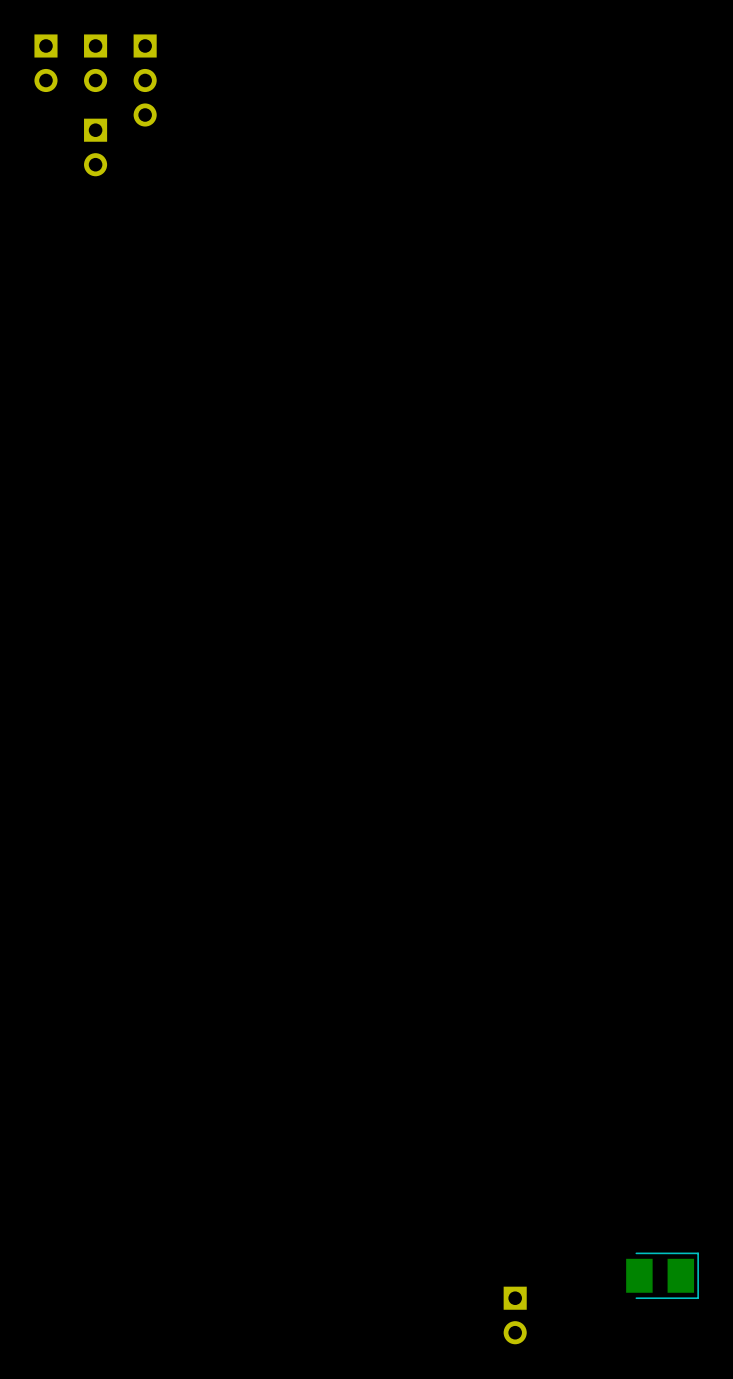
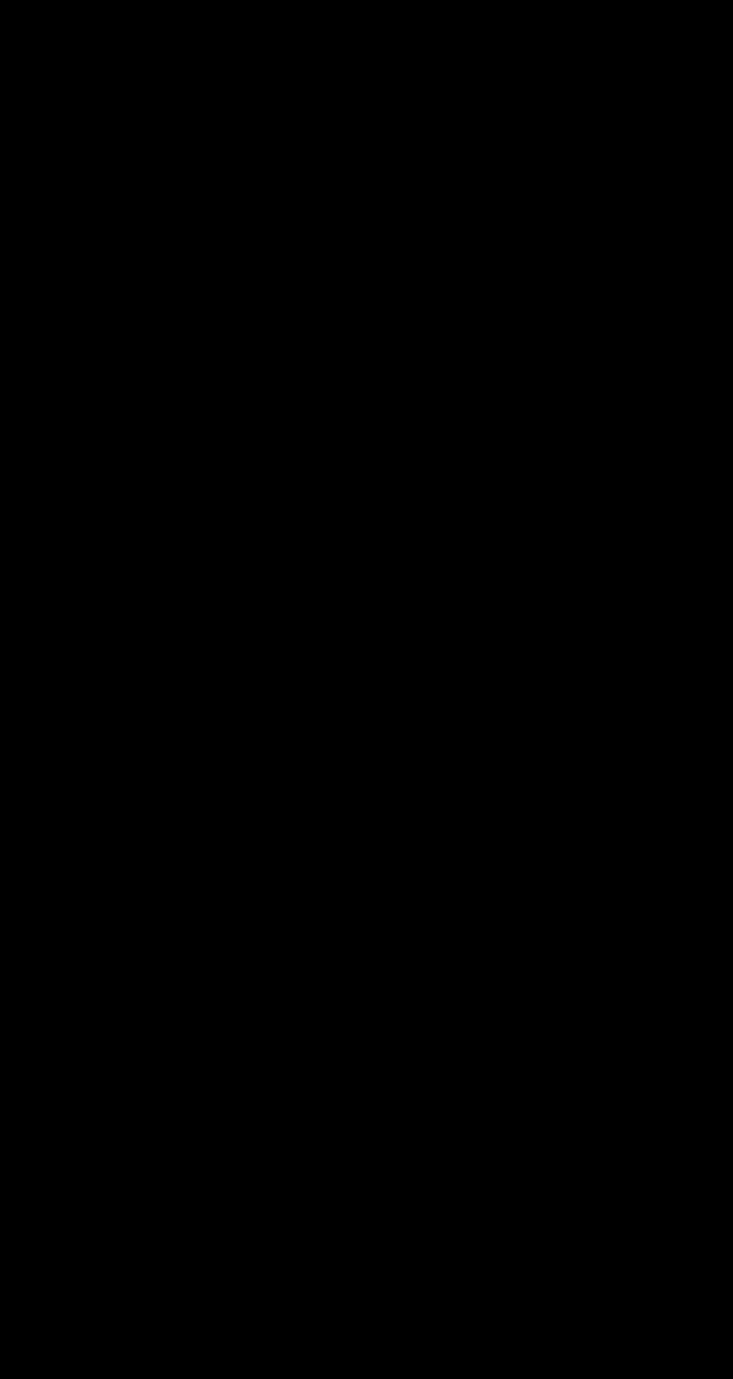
part: (45, 63) -> none
part: (95, 63) -> none
part: (145, 80) -> none
part: (95, 147) -> none
part: (662, 1275) -> none
part: (515, 1315) -> none

